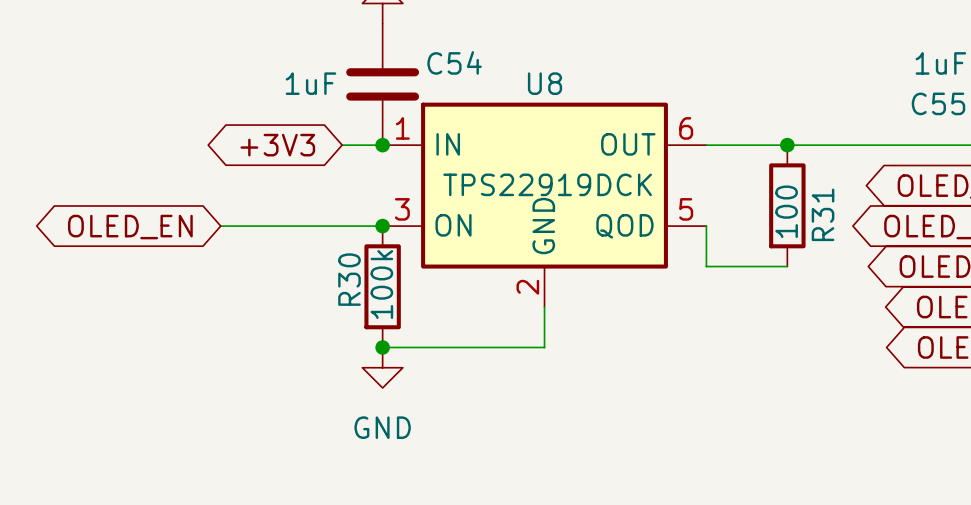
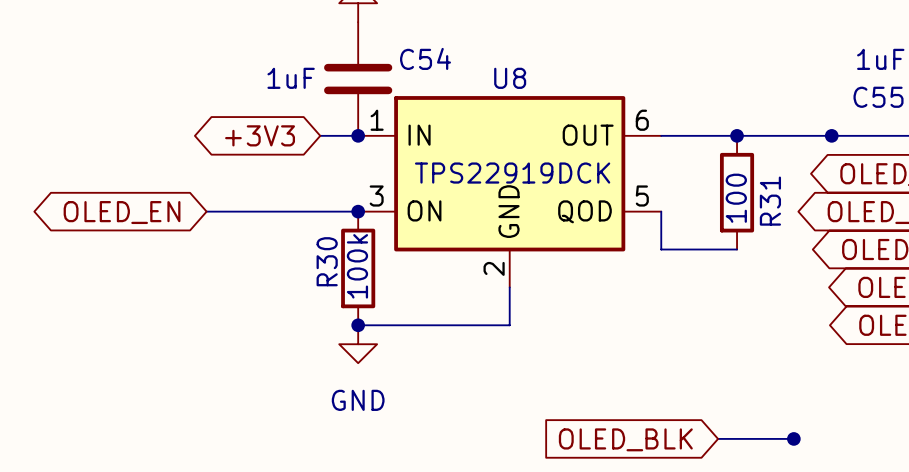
junction: none -> (831, 135)
wire: none -> (718, 438) (793, 438)
junction: none -> (793, 438)
global label: none -> OLED_BLK (625, 439)

